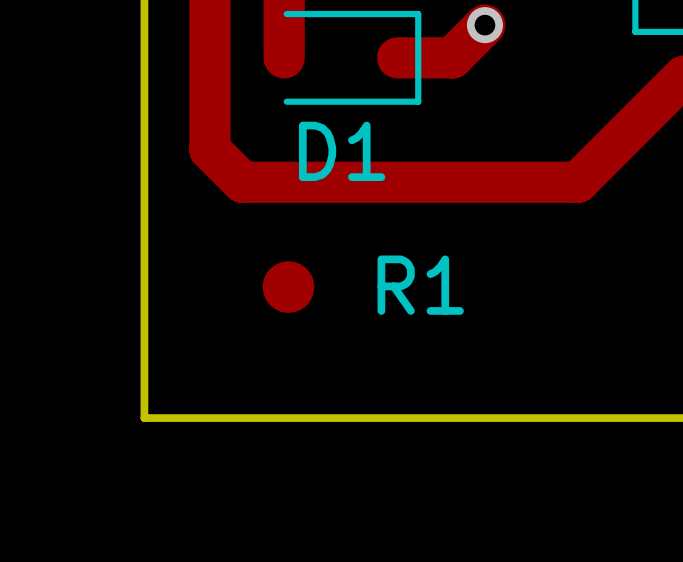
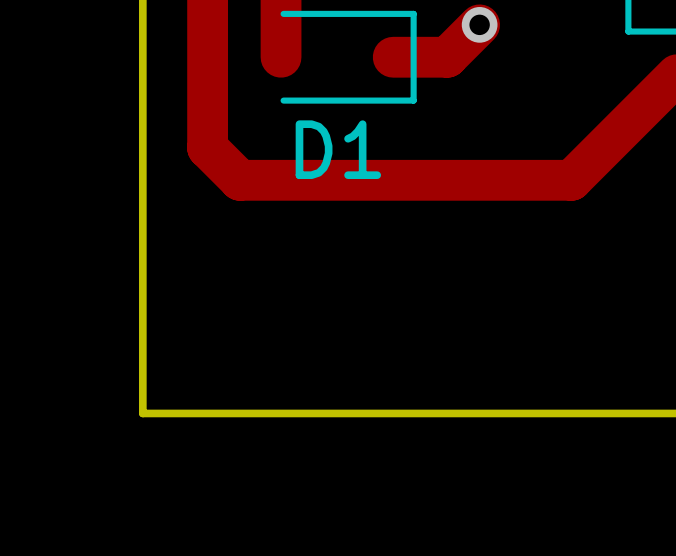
R1: (288, 287) -> none

